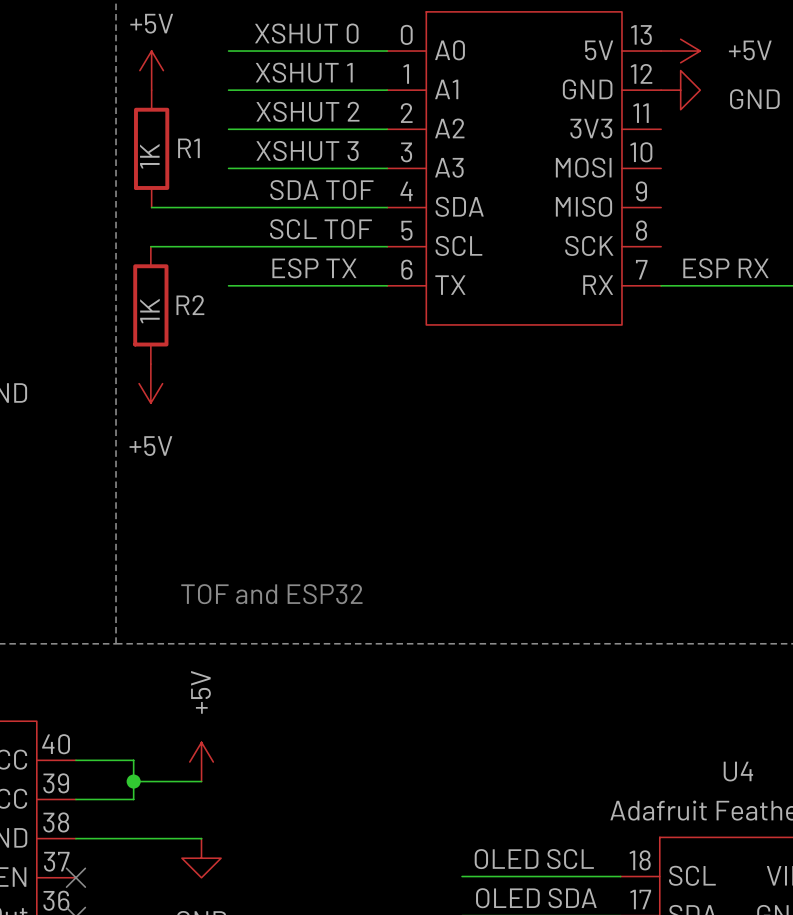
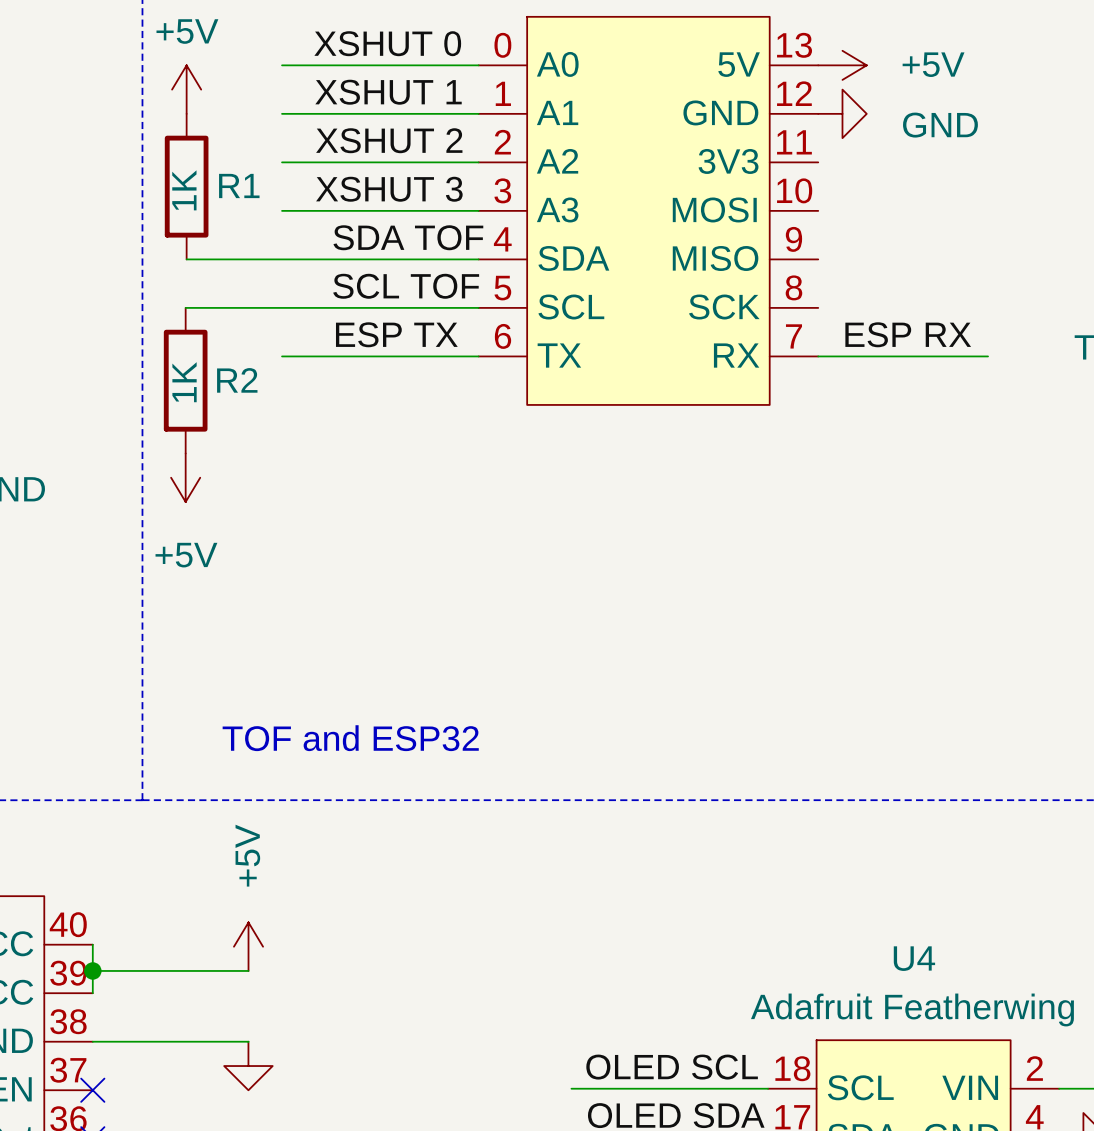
wire: (75, 760) (133, 760) (133, 799) (75, 799) -> (92, 944) (92, 993)
wire: none -> (92, 970) (164, 970)
junction position: (133, 781) -> (92, 970)

